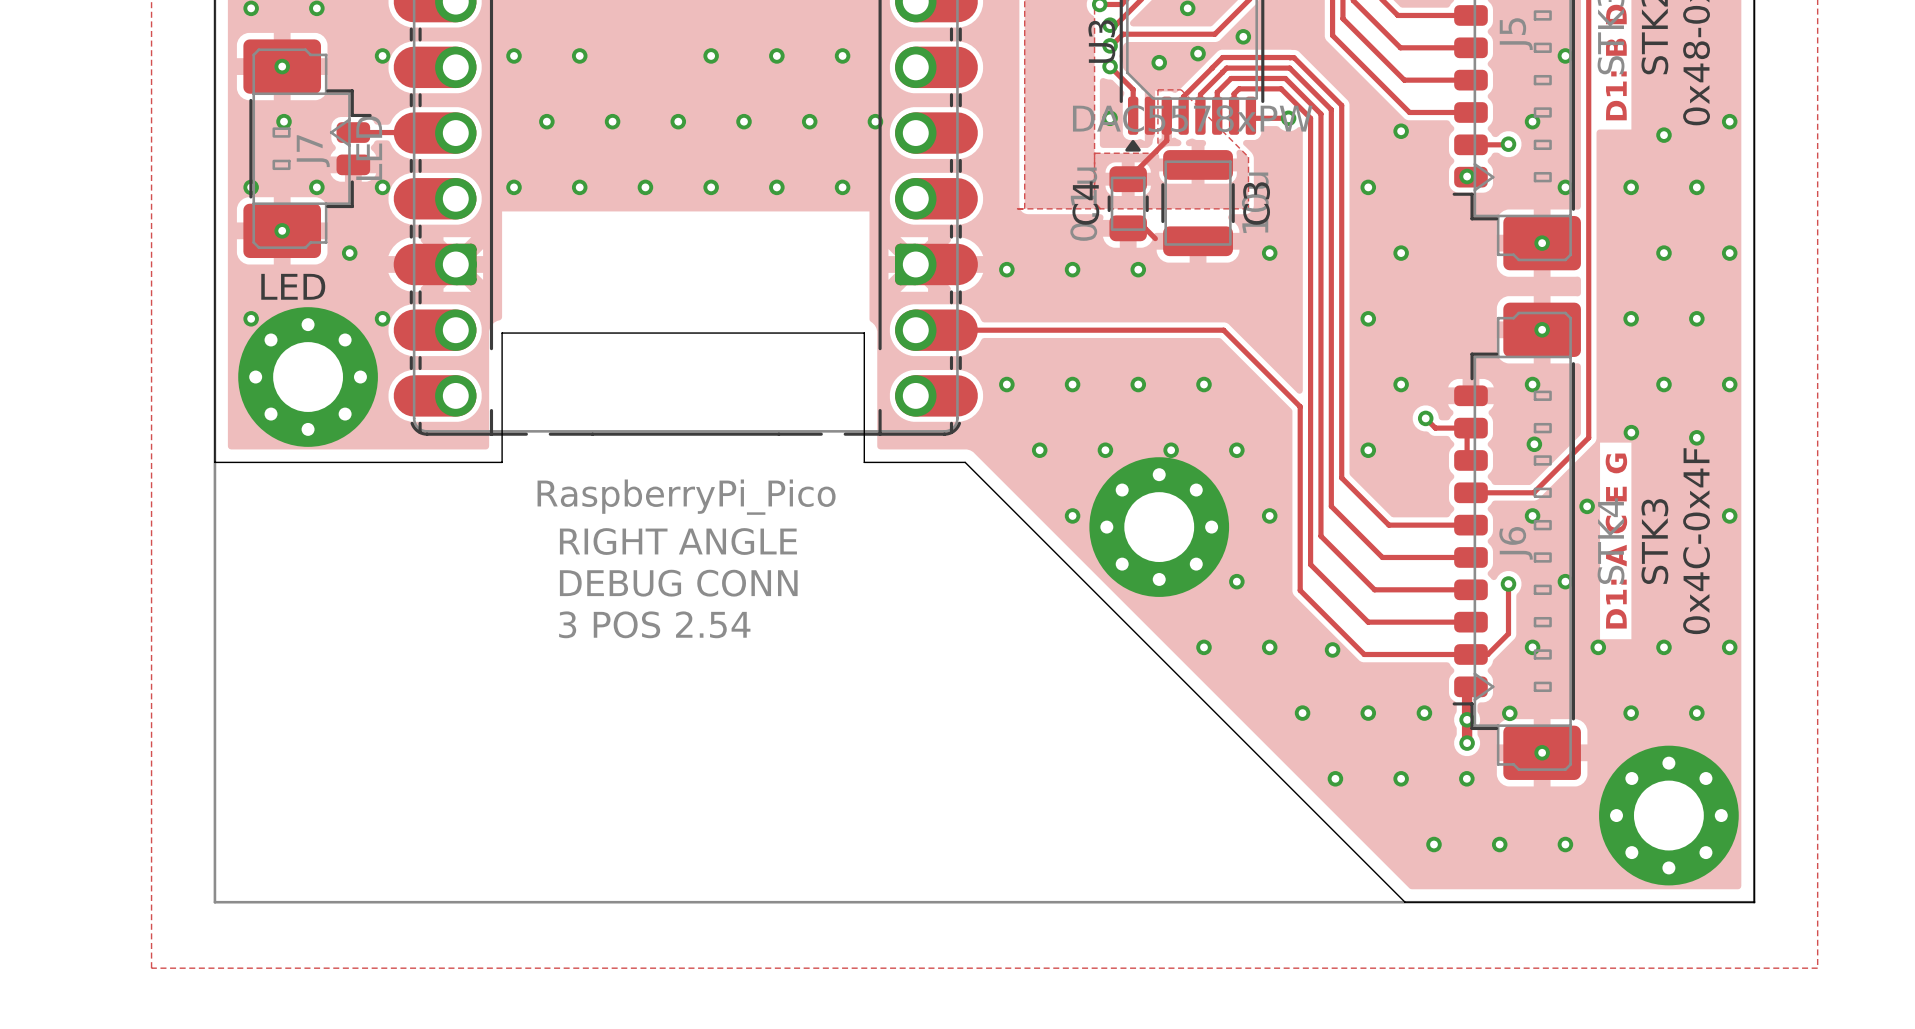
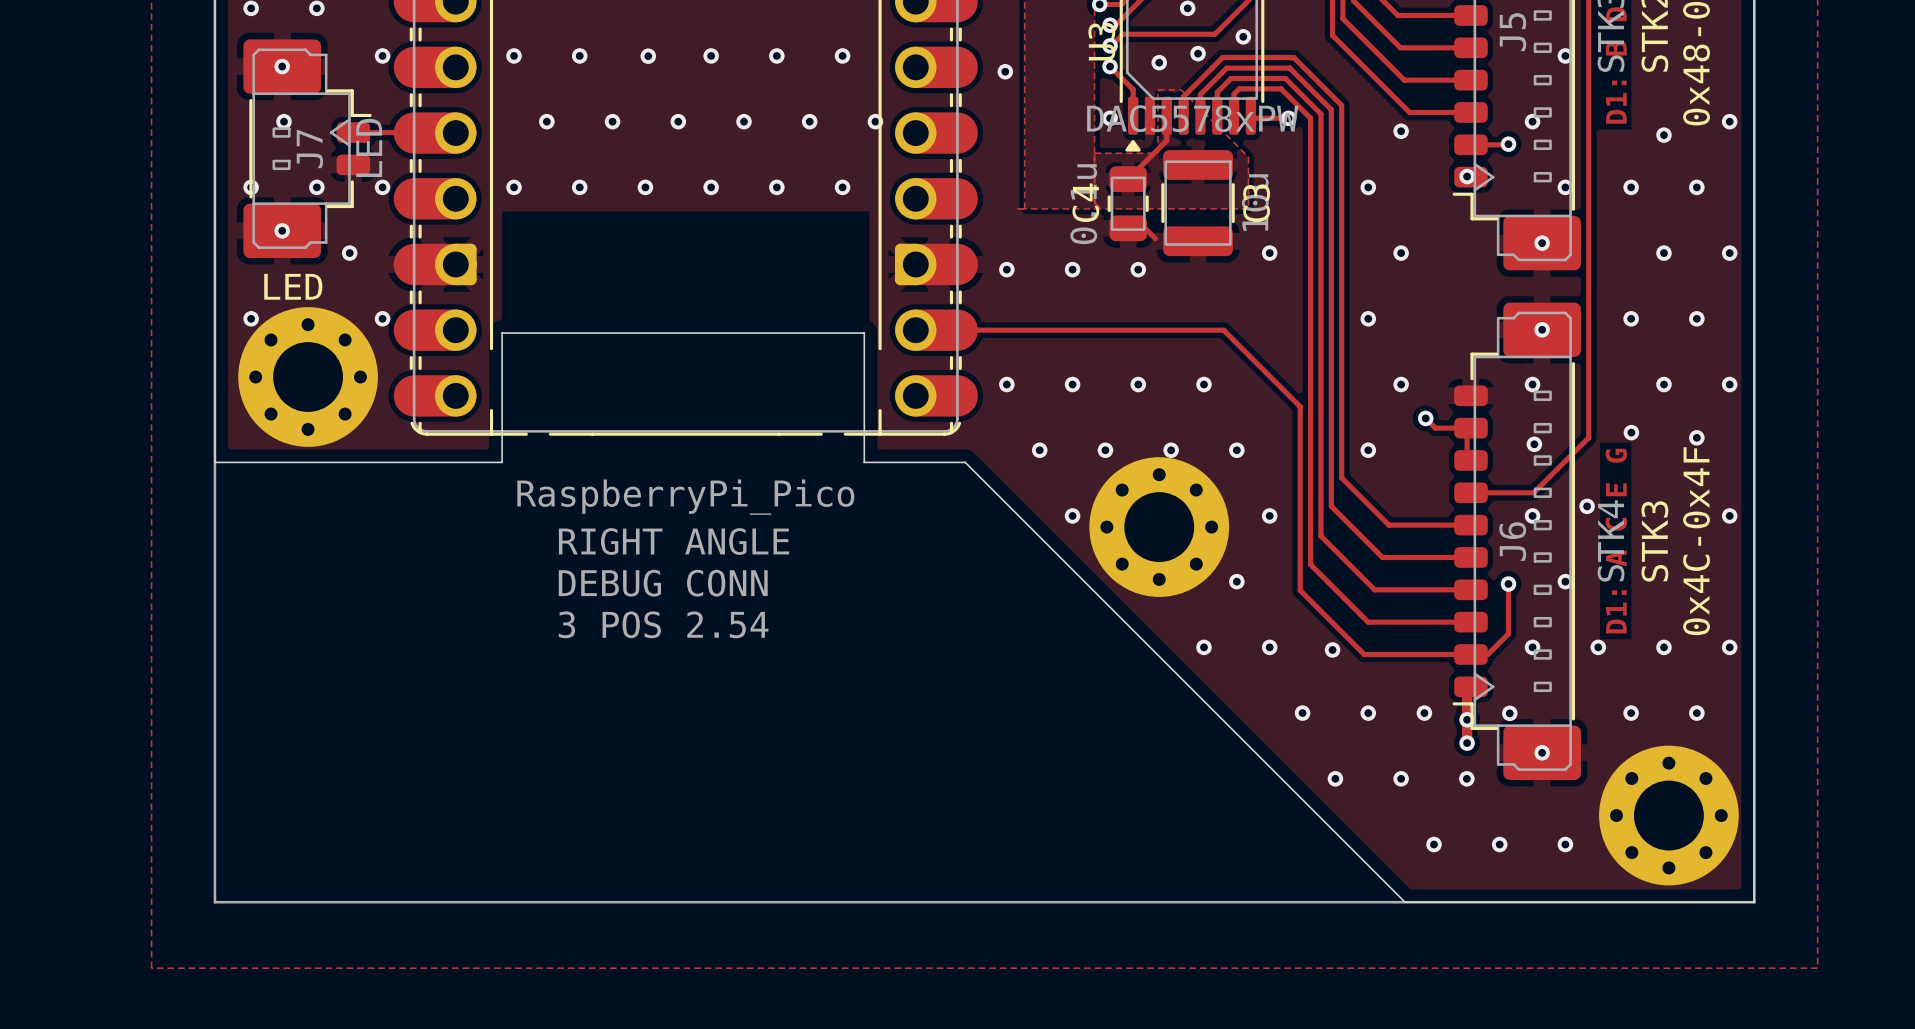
via: none -> (648, 56)
via: none -> (1005, 71)

